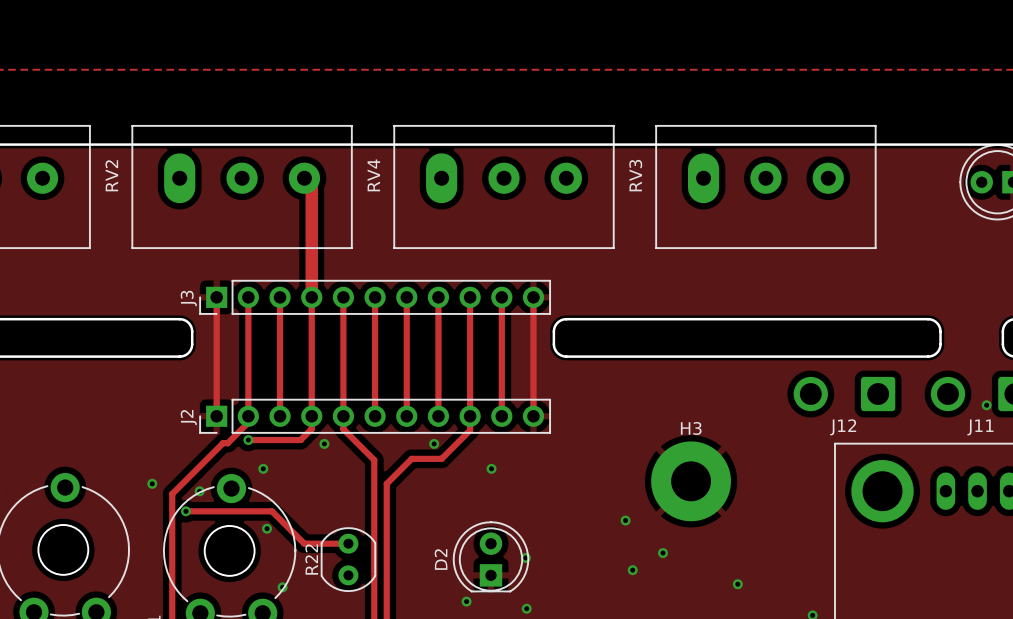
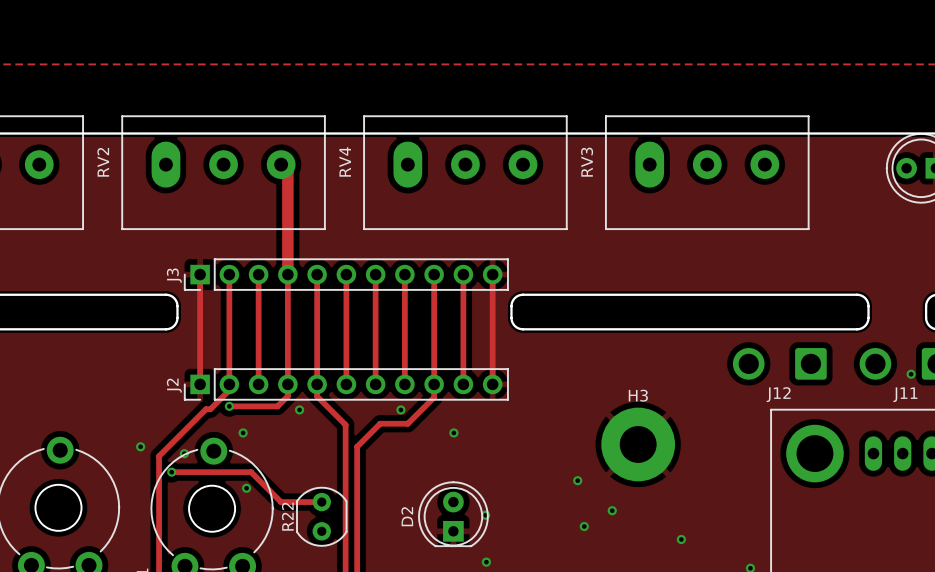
via: (282, 587) -> none
via: (466, 601) -> none

